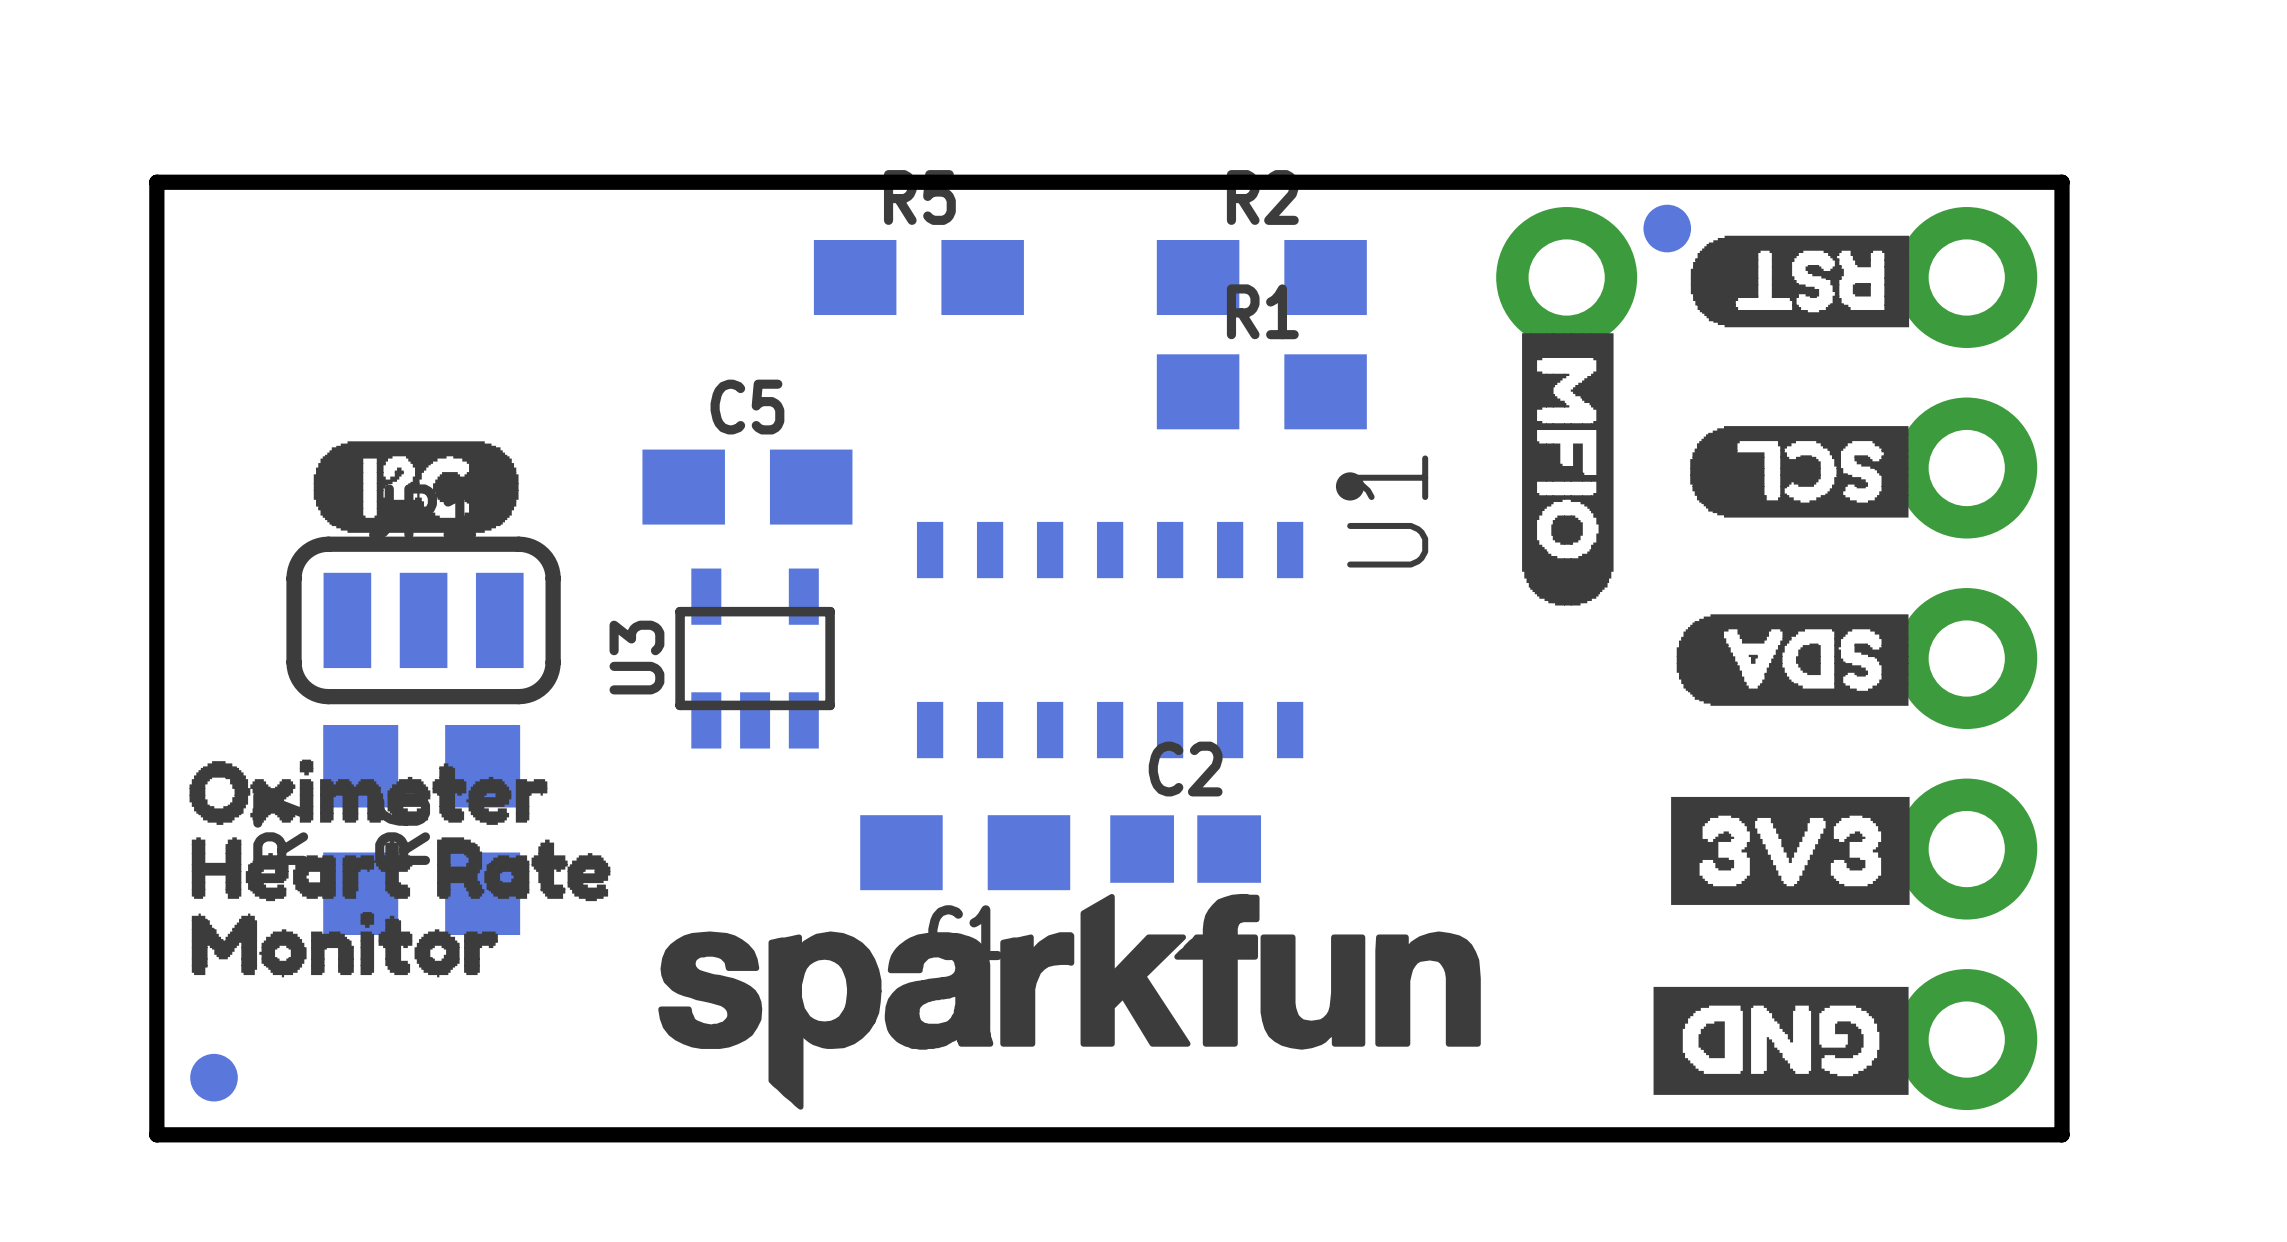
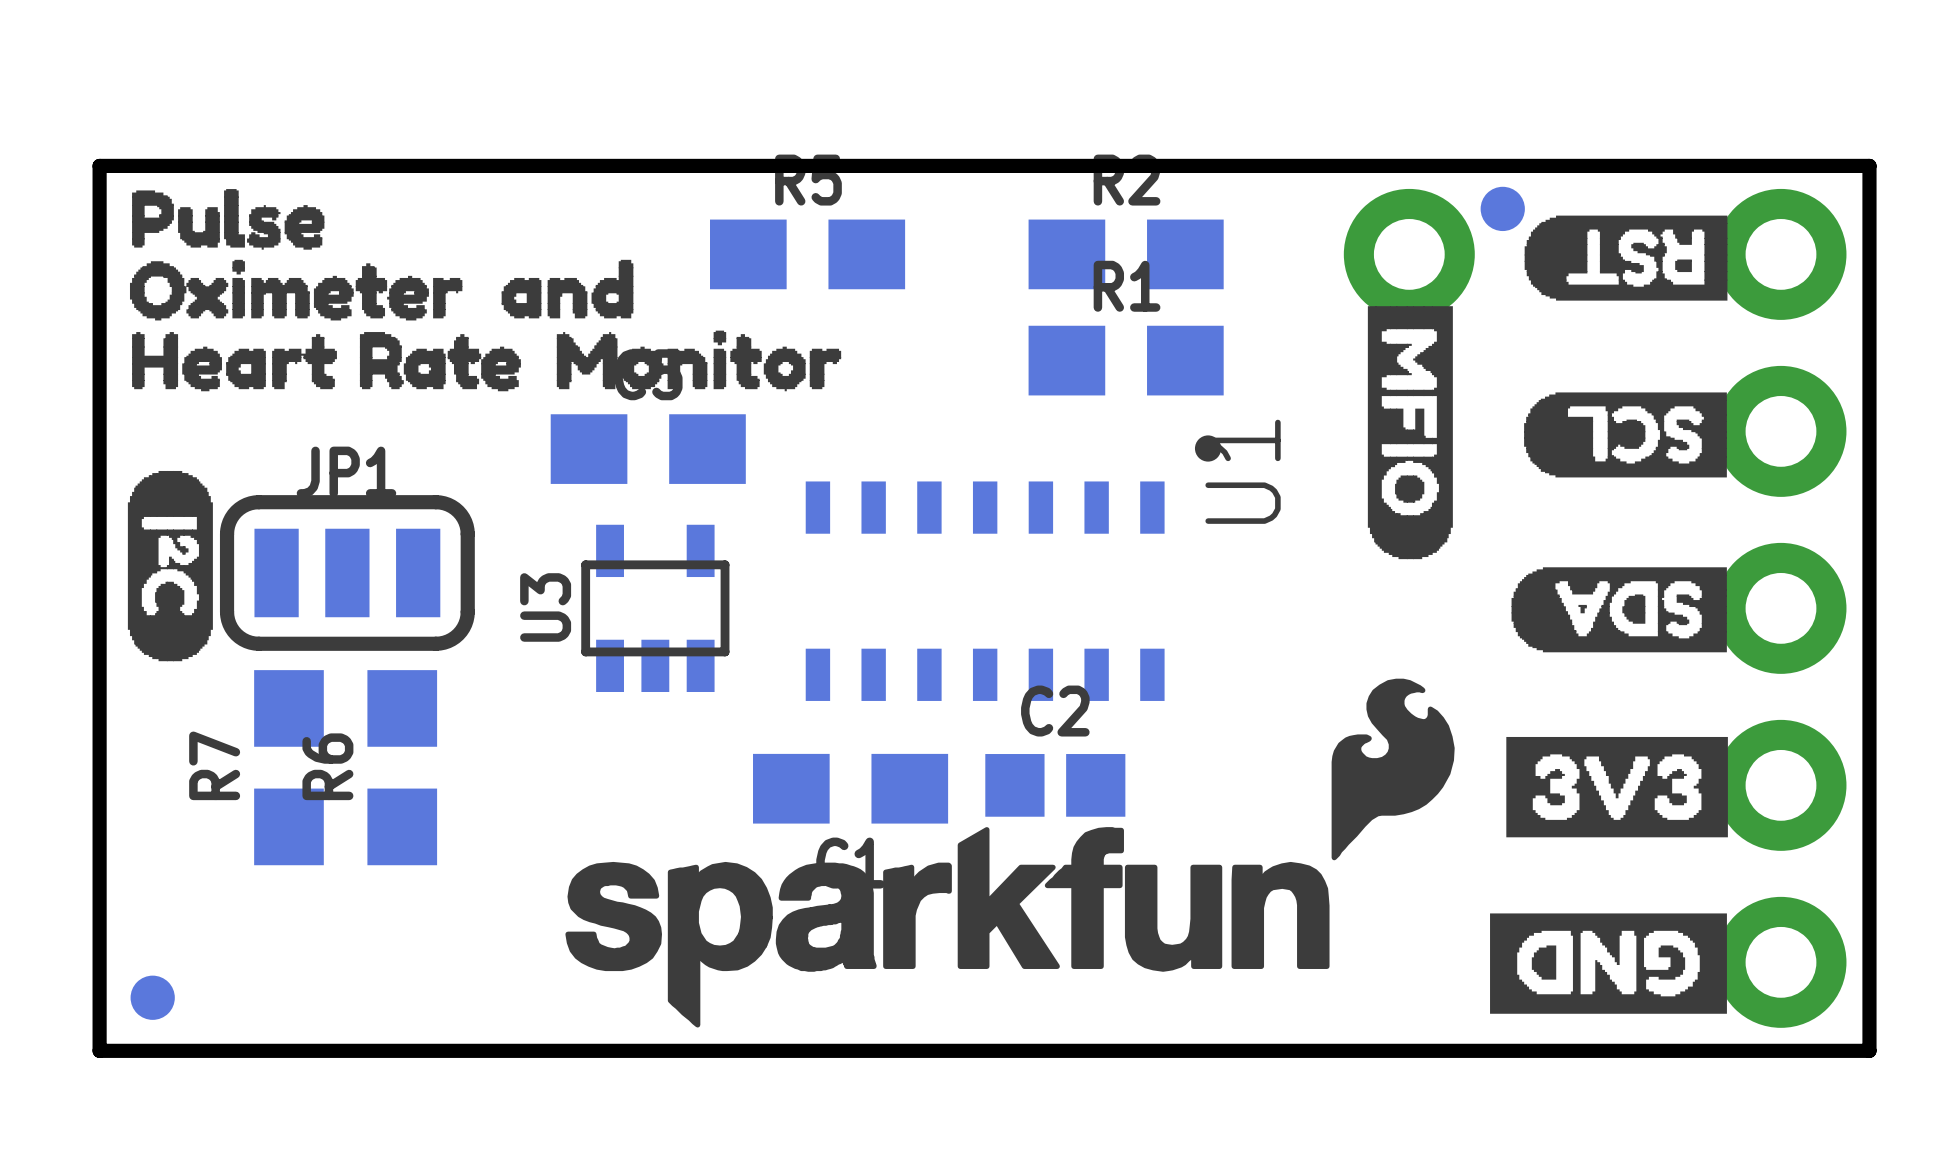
drawing: none -> [132, 189, 325, 250]
drawing: none -> [501, 259, 634, 319]
drawing: [313, 441, 519, 533] -> none
drawing: none -> [127, 470, 213, 662]
drawing: none -> [1331, 678, 1455, 861]
drawing position: (368, 792) -> (296, 290)
drawing position: (401, 869) -> (326, 361)
drawing position: (344, 944) -> (698, 360)

